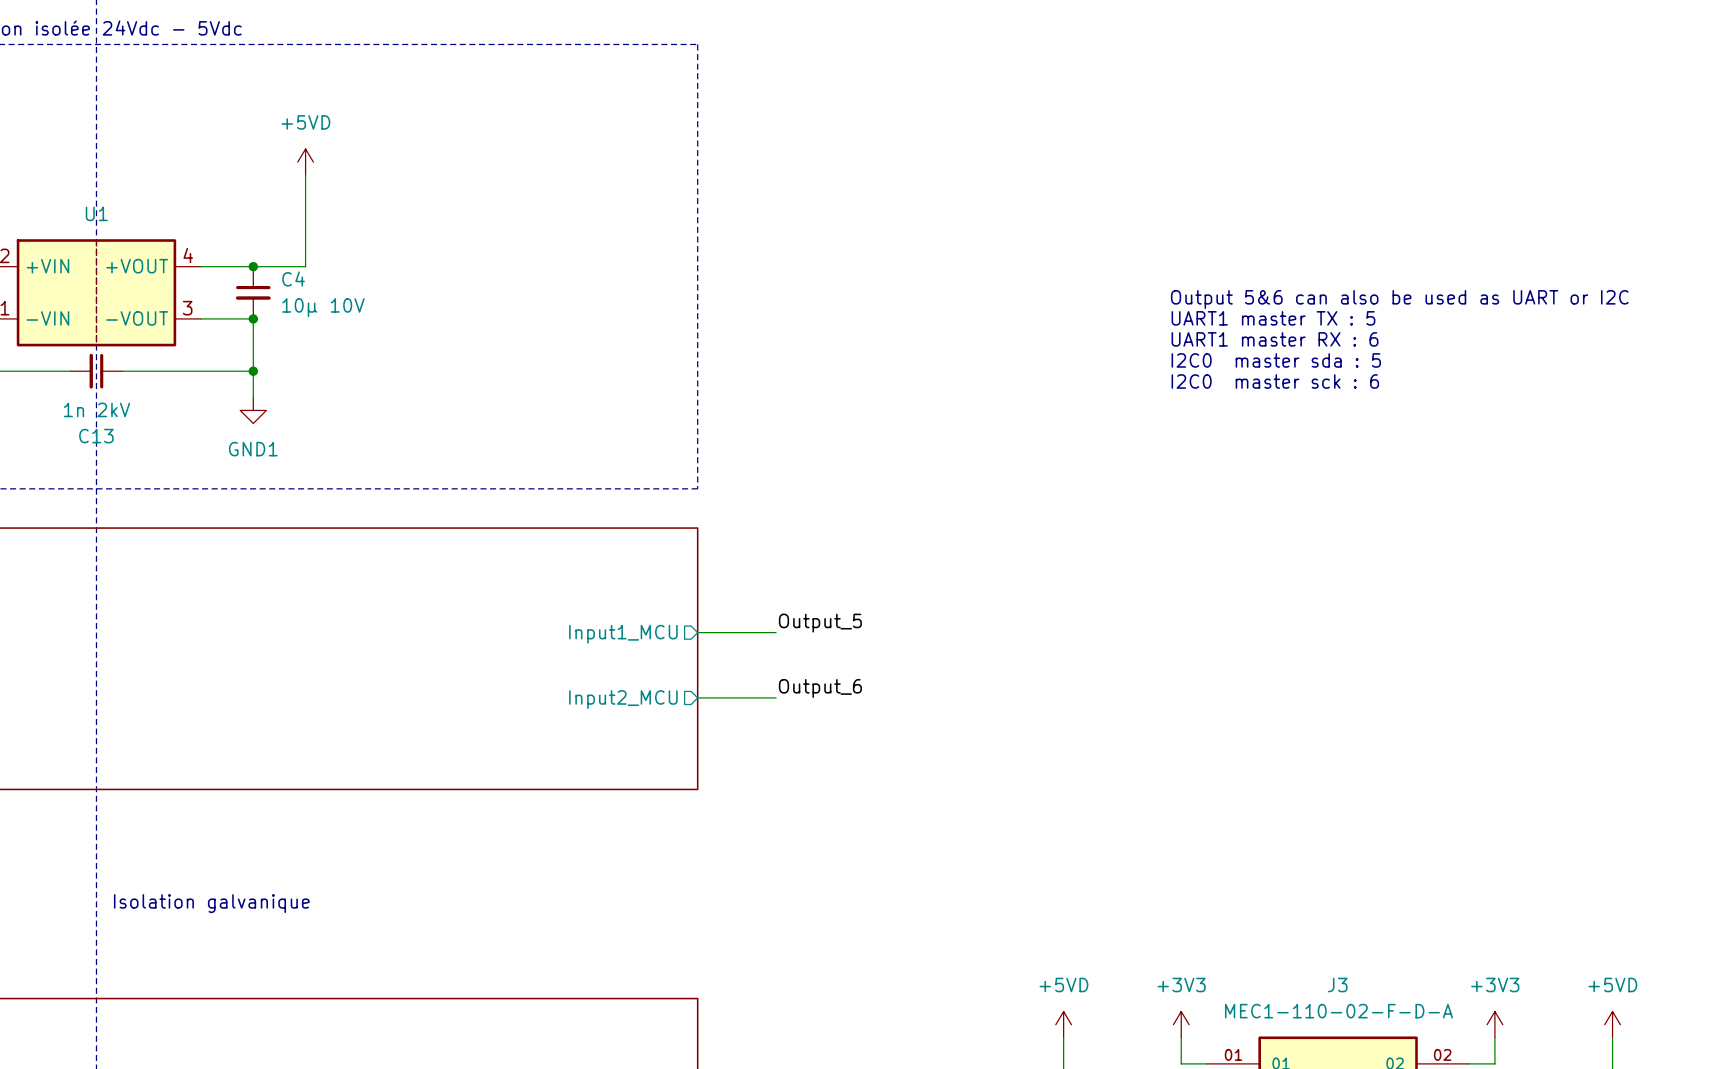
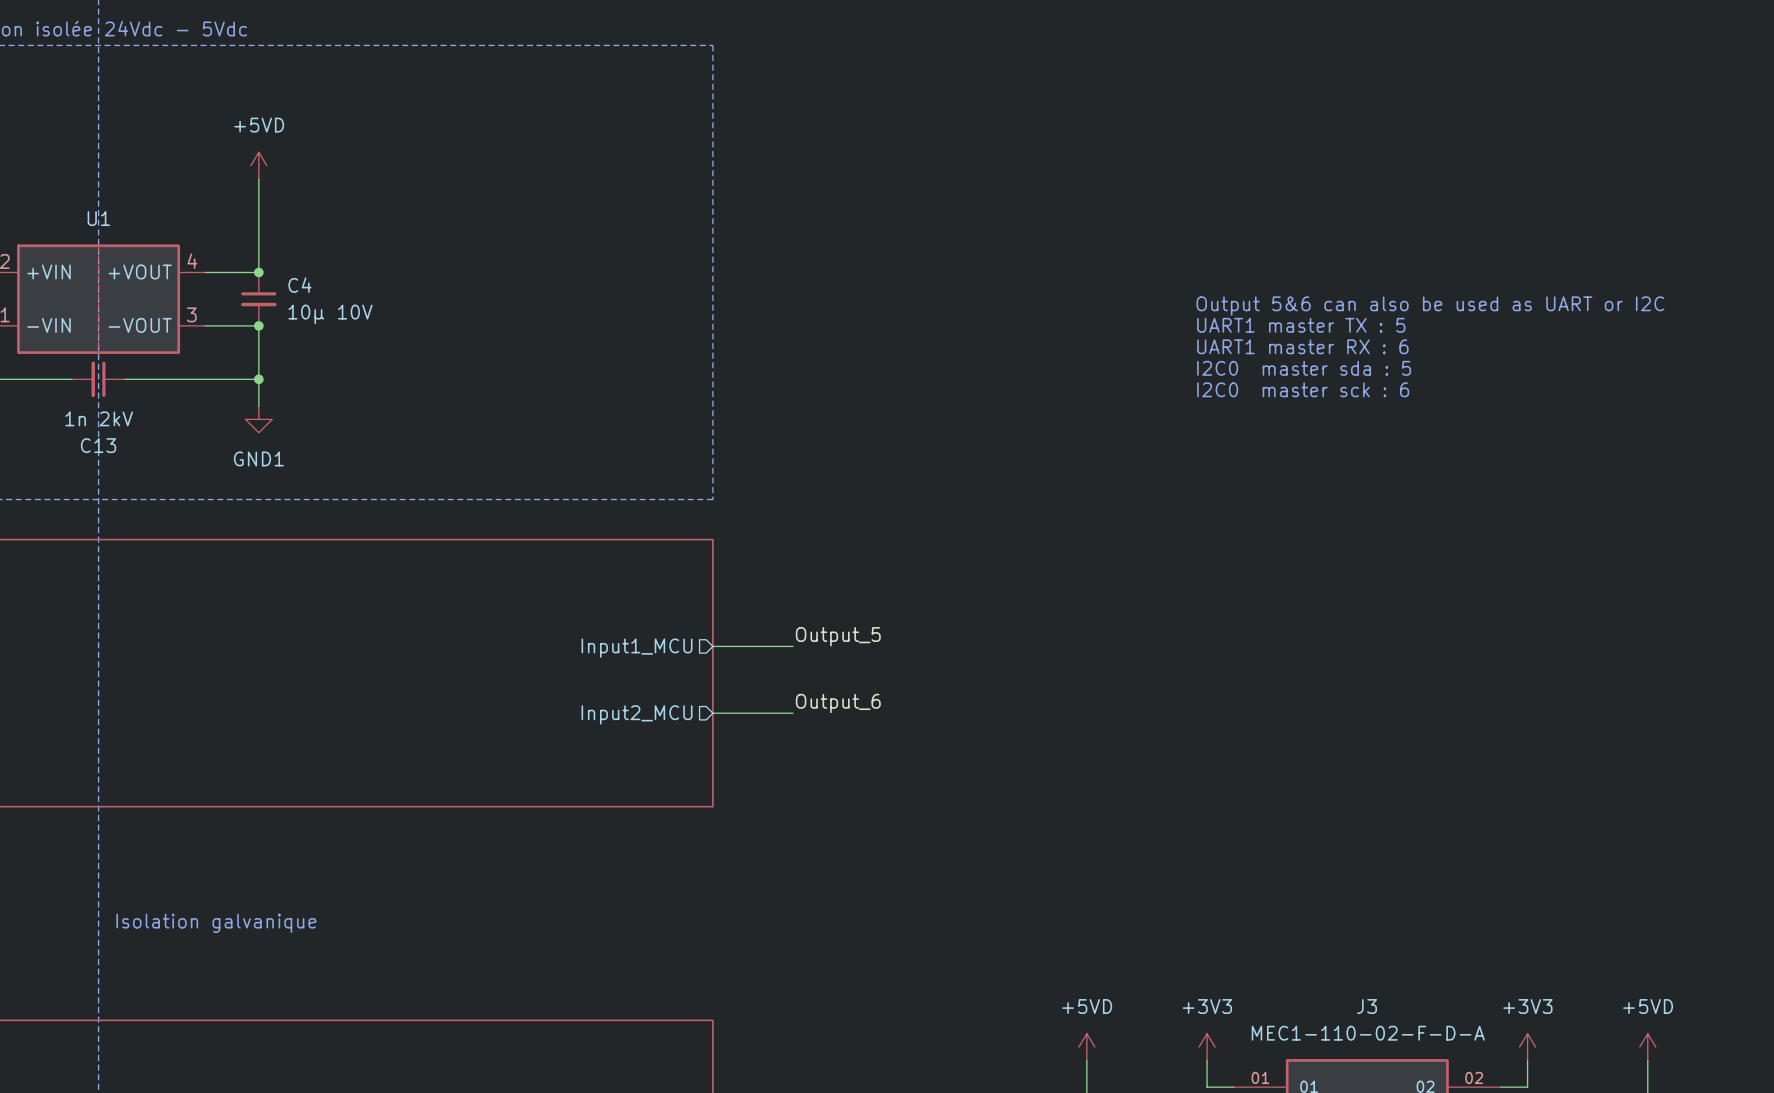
power symbol position: +5VD (305, 162) -> +5VD (258, 165)
wire: (305, 175) (305, 266) (253, 266) -> (258, 178) (258, 272)

